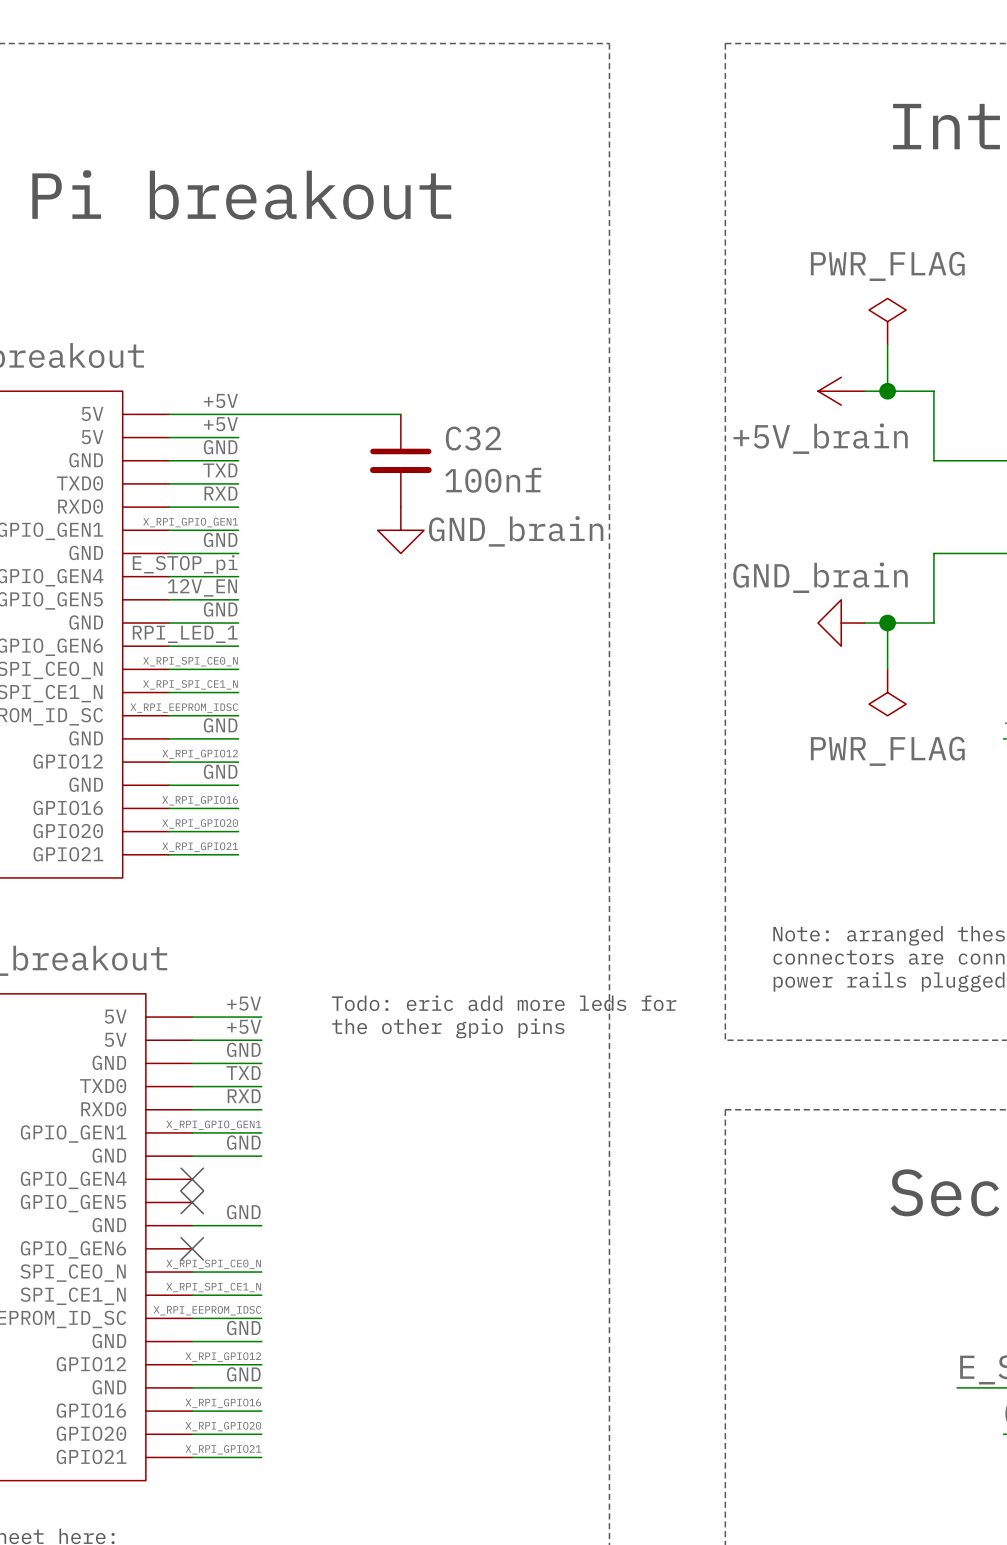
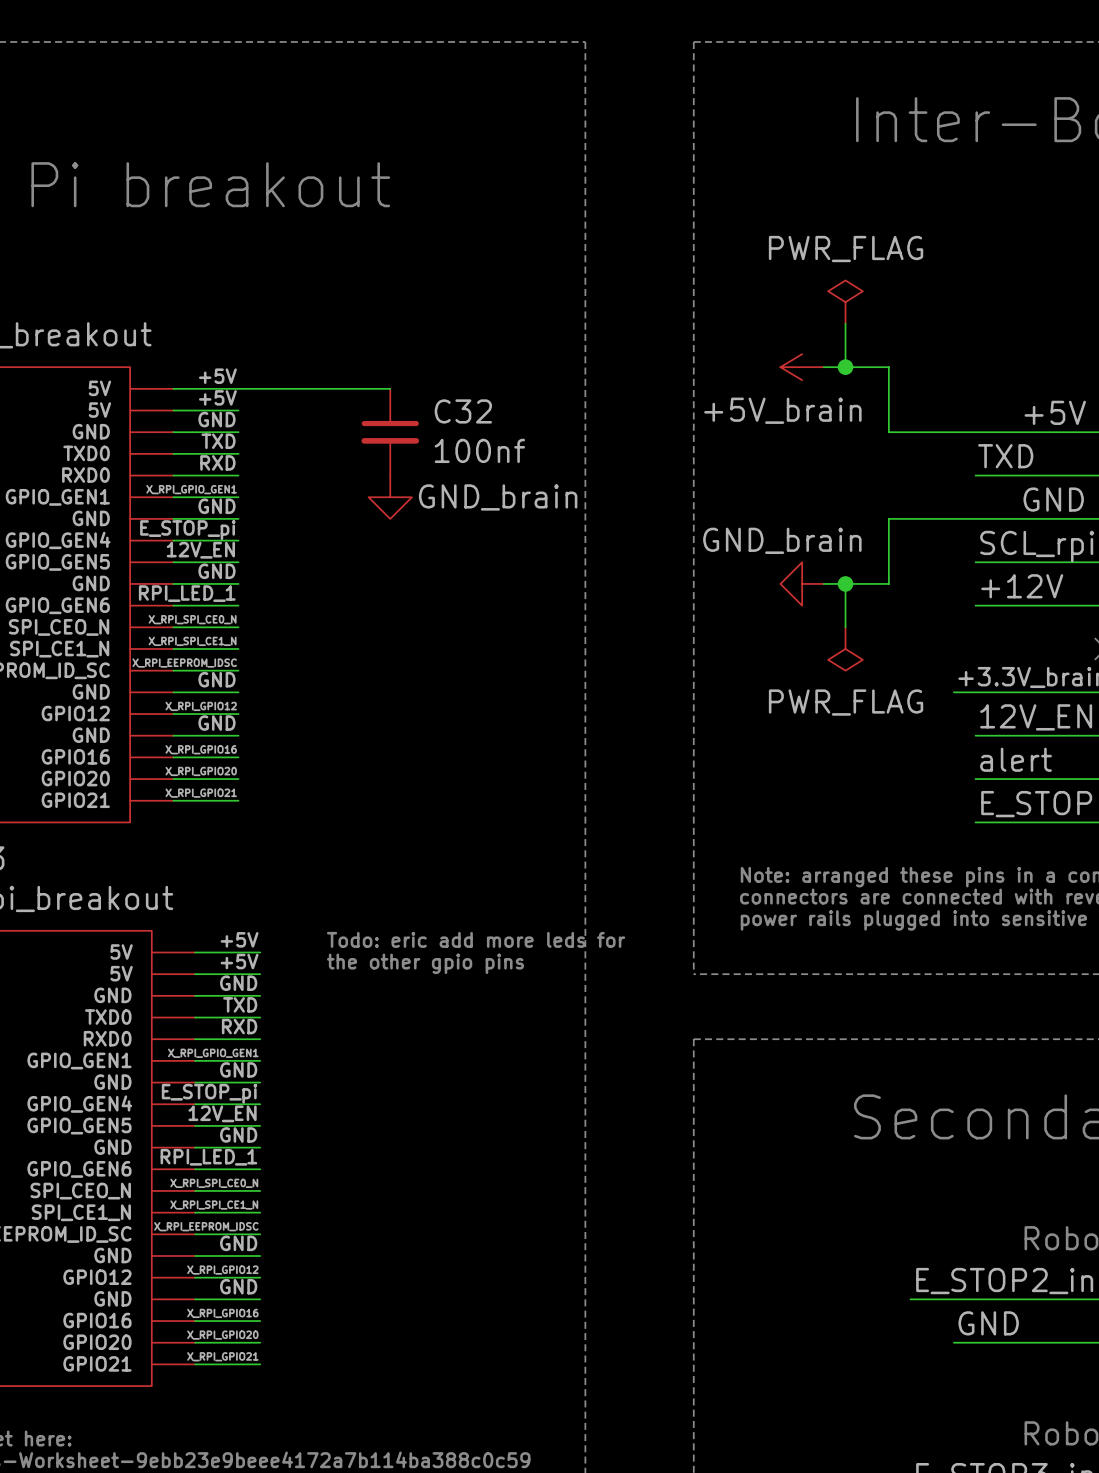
label: none -> E_STOP_pi (209, 1093)
wire: none -> (195, 1104) (260, 1104)
no-connect mark: (192, 1179) -> none
label: none -> 12V_EN (222, 1113)
wire: none -> (195, 1125) (260, 1125)
no-connect mark: (192, 1202) -> none
label: none -> RPI_LED_1 (208, 1157)
wire: none -> (195, 1169) (260, 1169)
no-connect mark: (192, 1248) -> none

